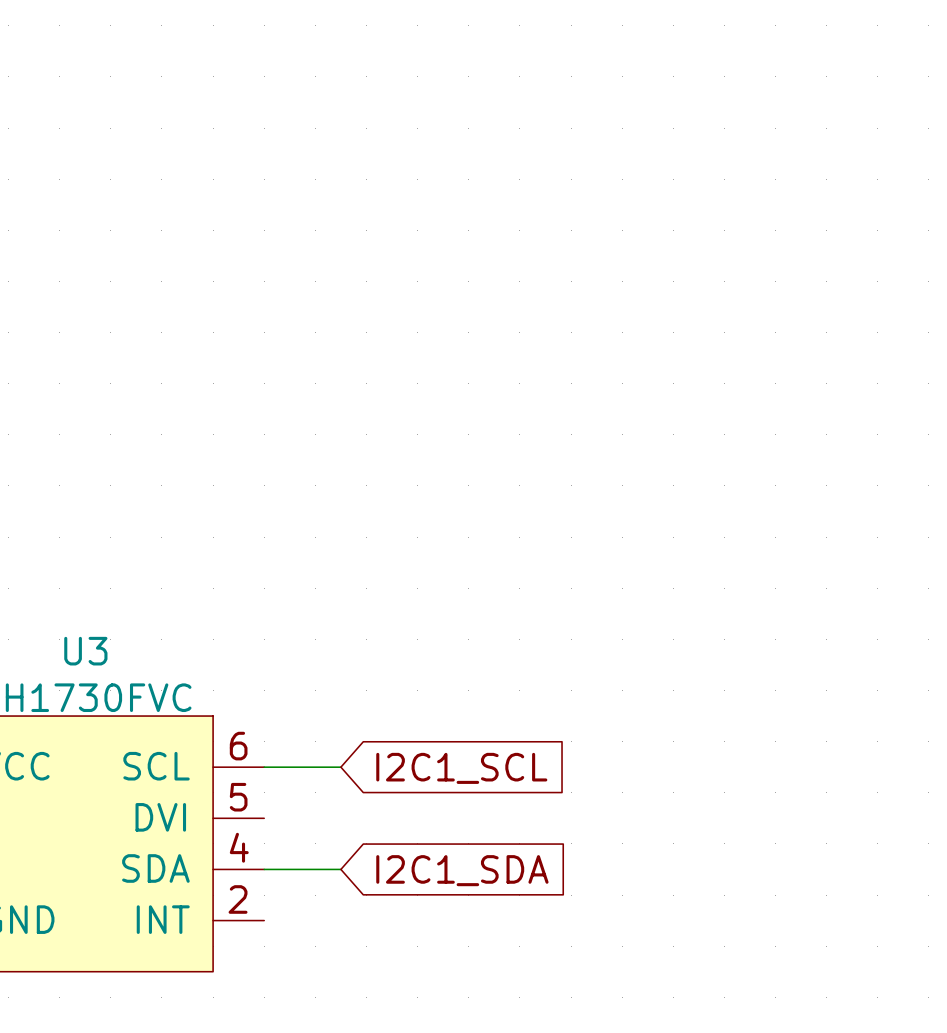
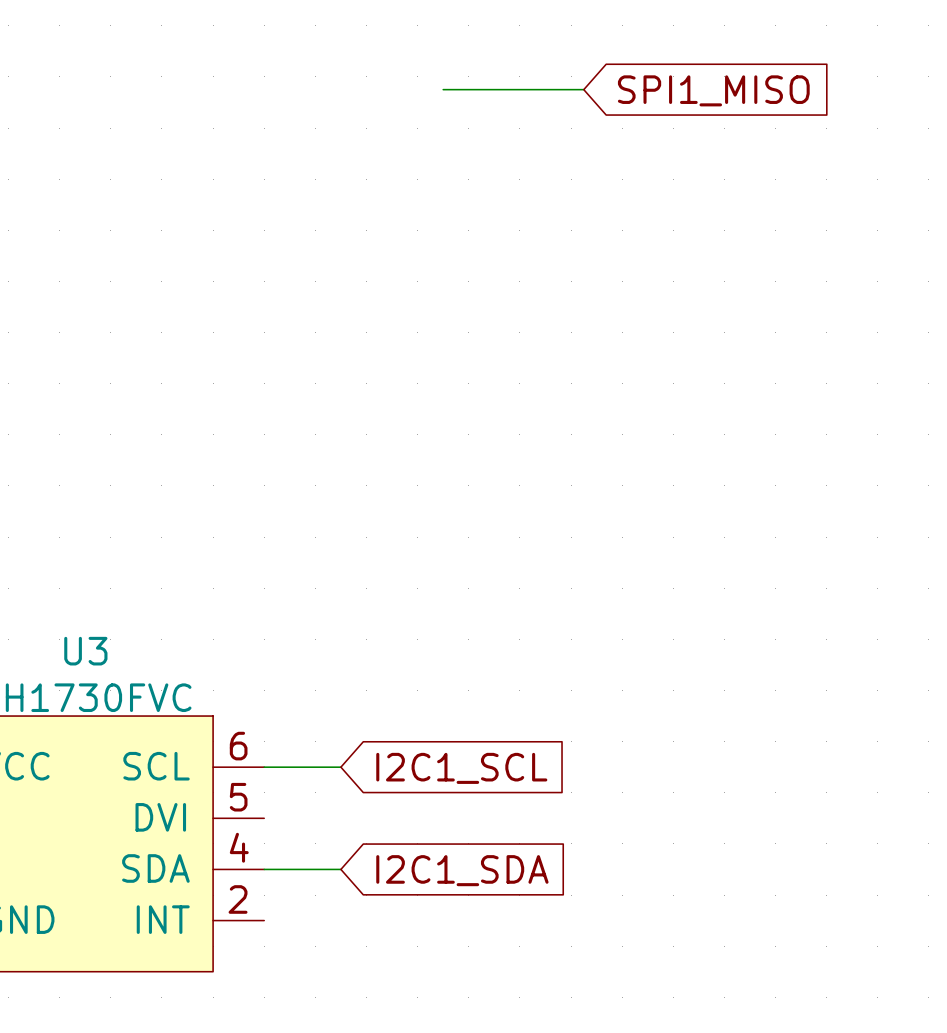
wire: none -> (443, 89) (583, 89)
global label: none -> SPI1_MISO (713, 90)

